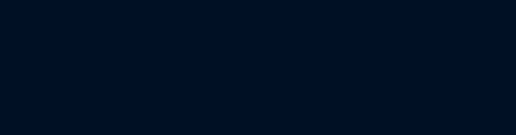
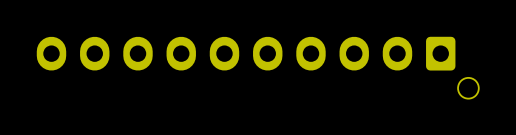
part: none -> (257, 67)

